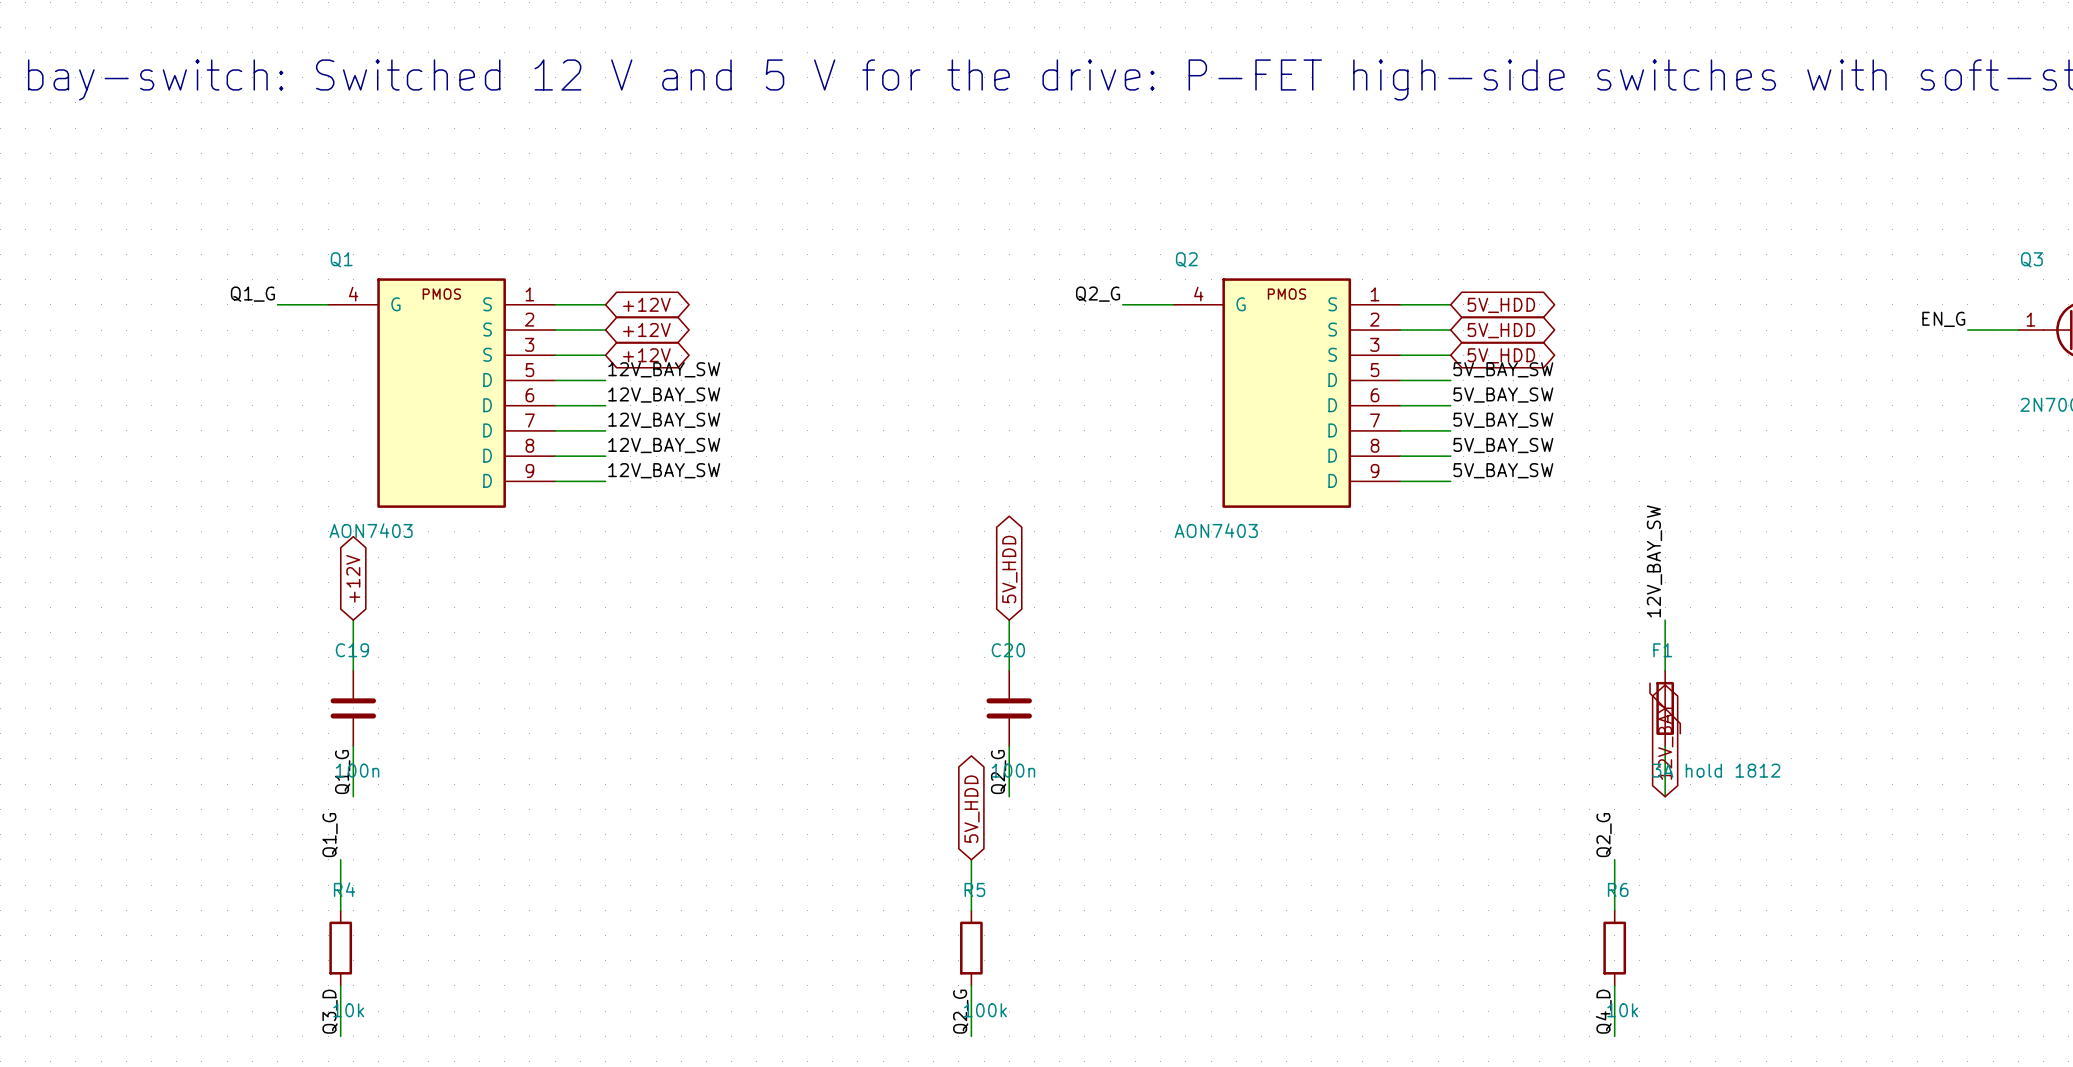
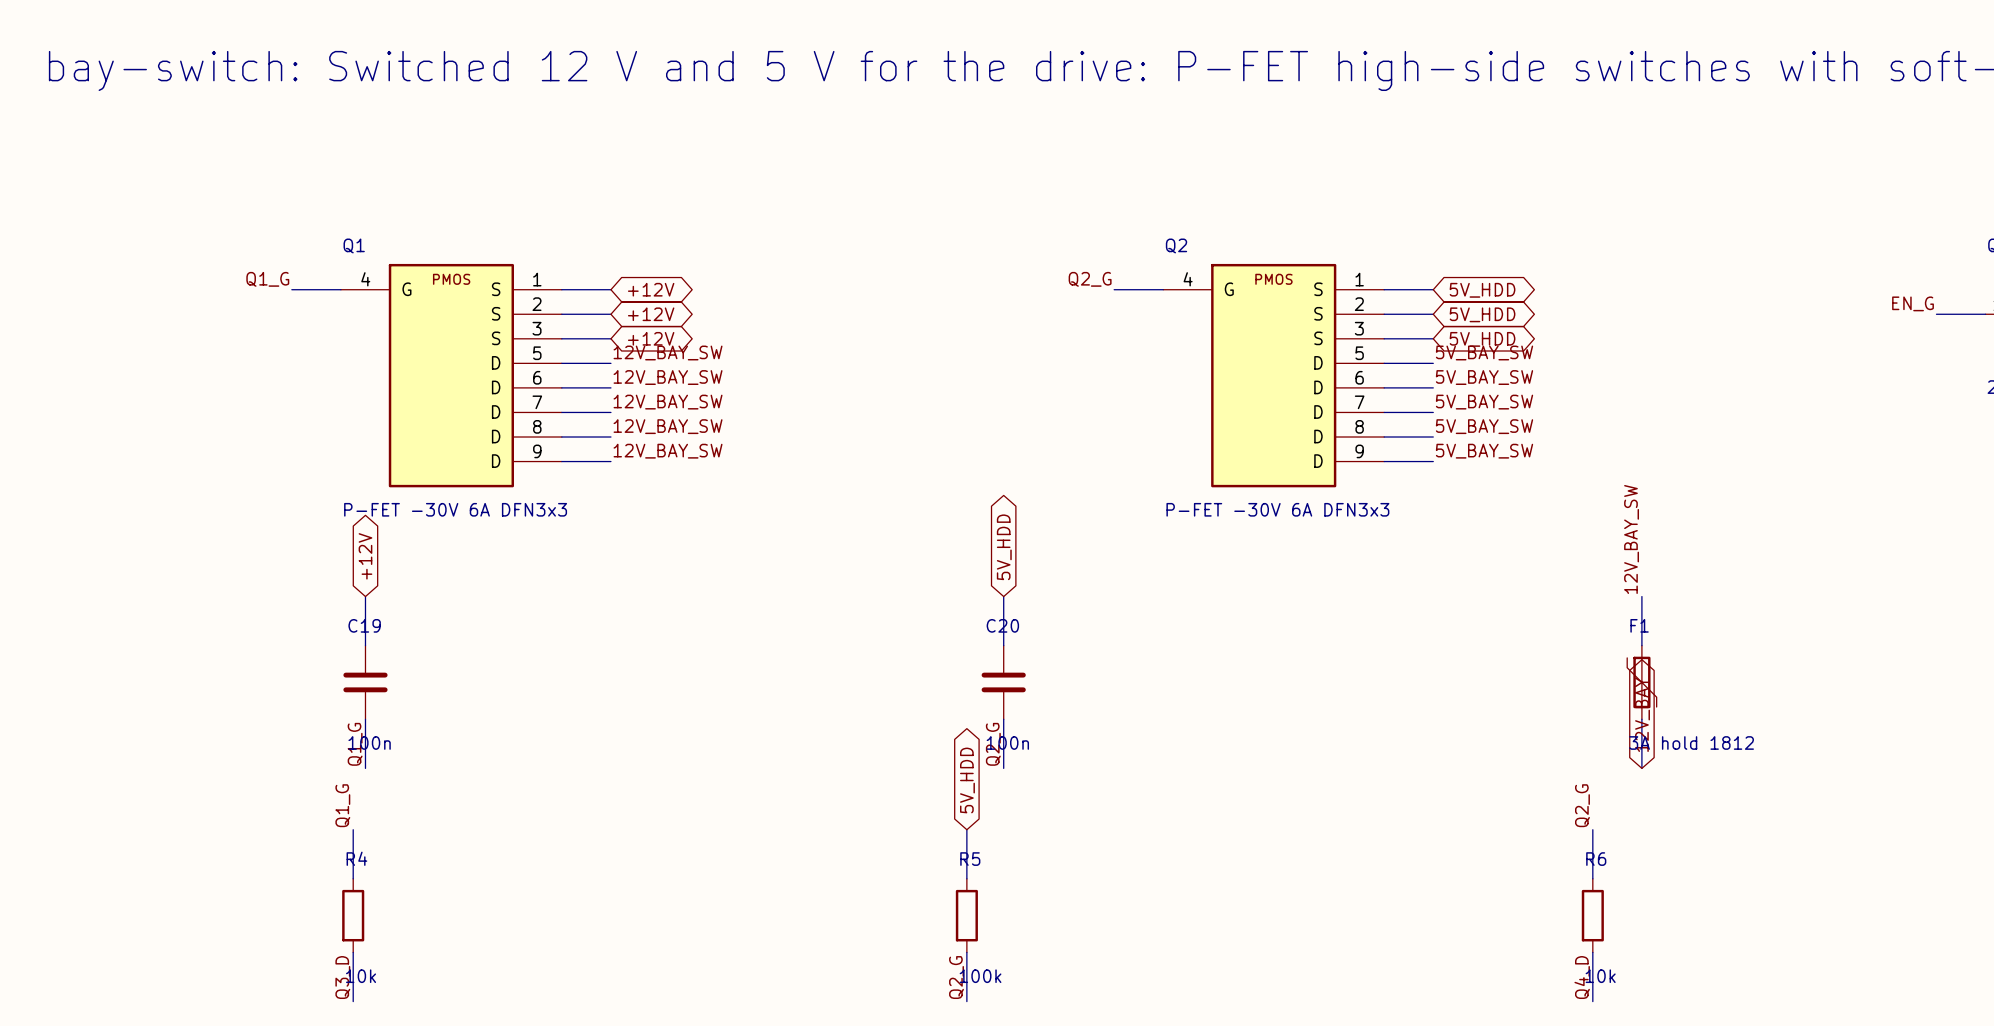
Q1 value: AON7403 (371, 530) -> P-FET -30V 6A DFN3x3 (455, 509)
Q2 value: AON7403 (1216, 530) -> P-FET -30V 6A DFN3x3 (1277, 509)

